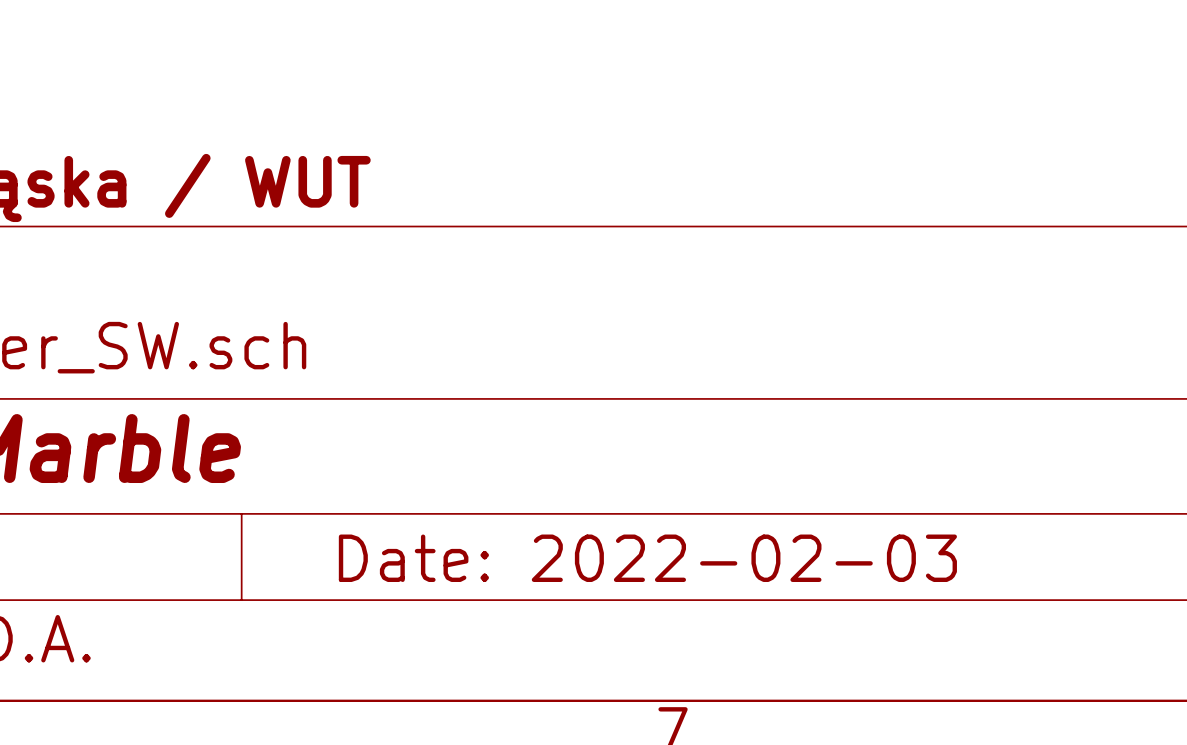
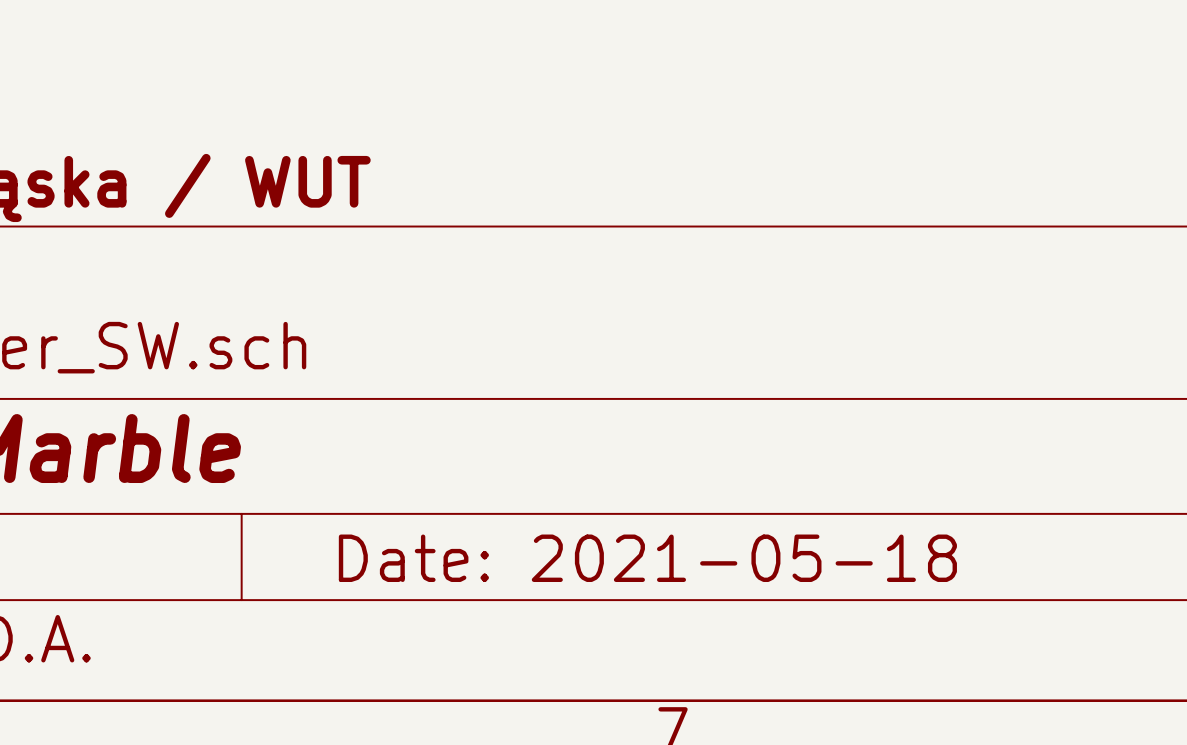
title block: Date: 2022-02-03 (647, 558) -> Date: 2021-05-18 (647, 558)

